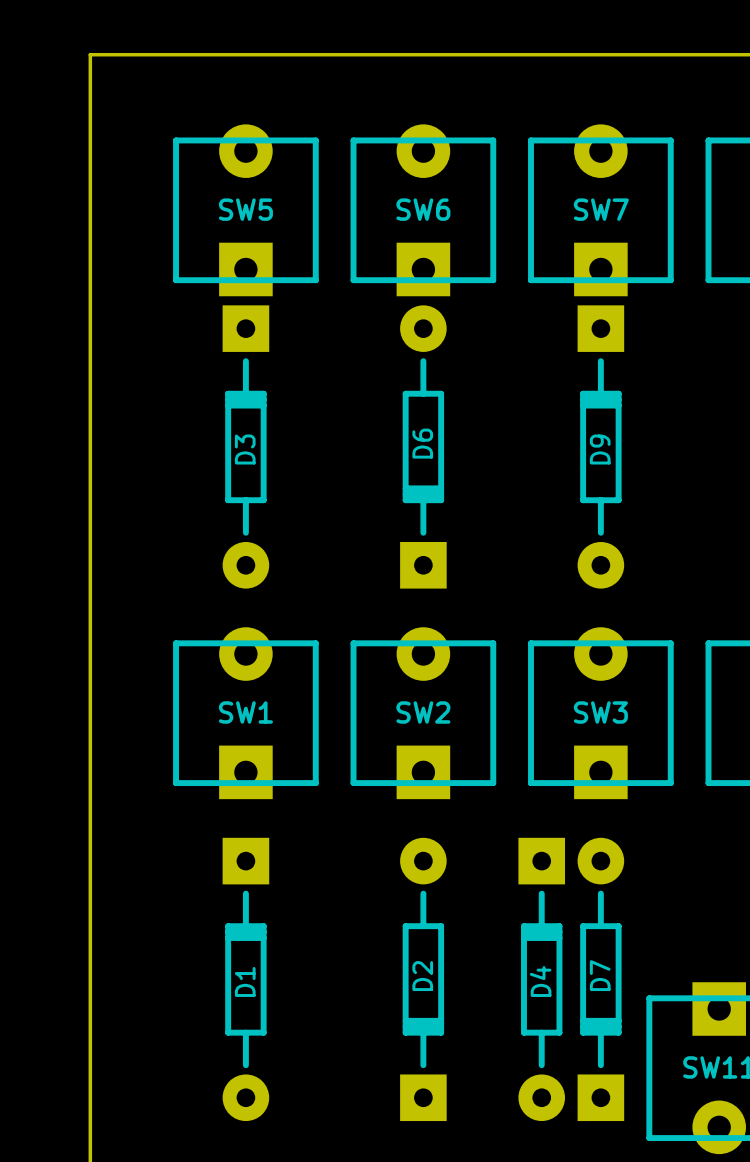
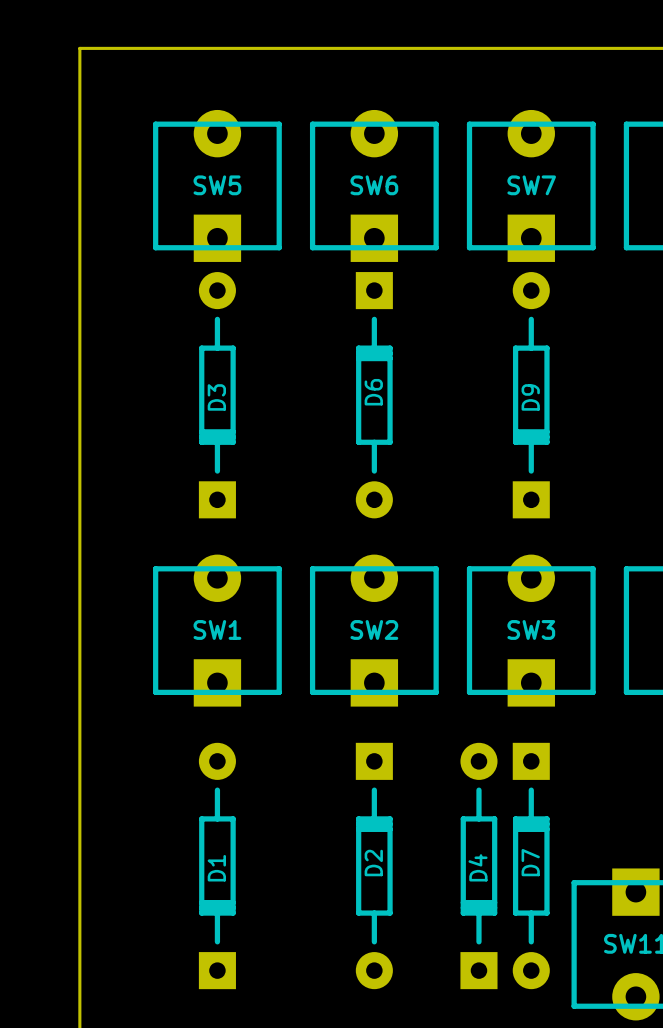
D3 footprint: [222, 305, 270, 589] -> [198, 272, 236, 519]
D6 footprint: [400, 305, 447, 589] -> [355, 272, 393, 519]
D9 footprint: [577, 305, 625, 589] -> [512, 272, 550, 519]
D1 footprint: [222, 837, 270, 1122] -> [198, 742, 236, 990]
D2 footprint: [400, 837, 447, 1122] -> [355, 742, 393, 990]
D4 footprint: [518, 837, 566, 1122] -> [460, 742, 498, 990]
D7 footprint: [577, 837, 625, 1122] -> [512, 742, 550, 990]

